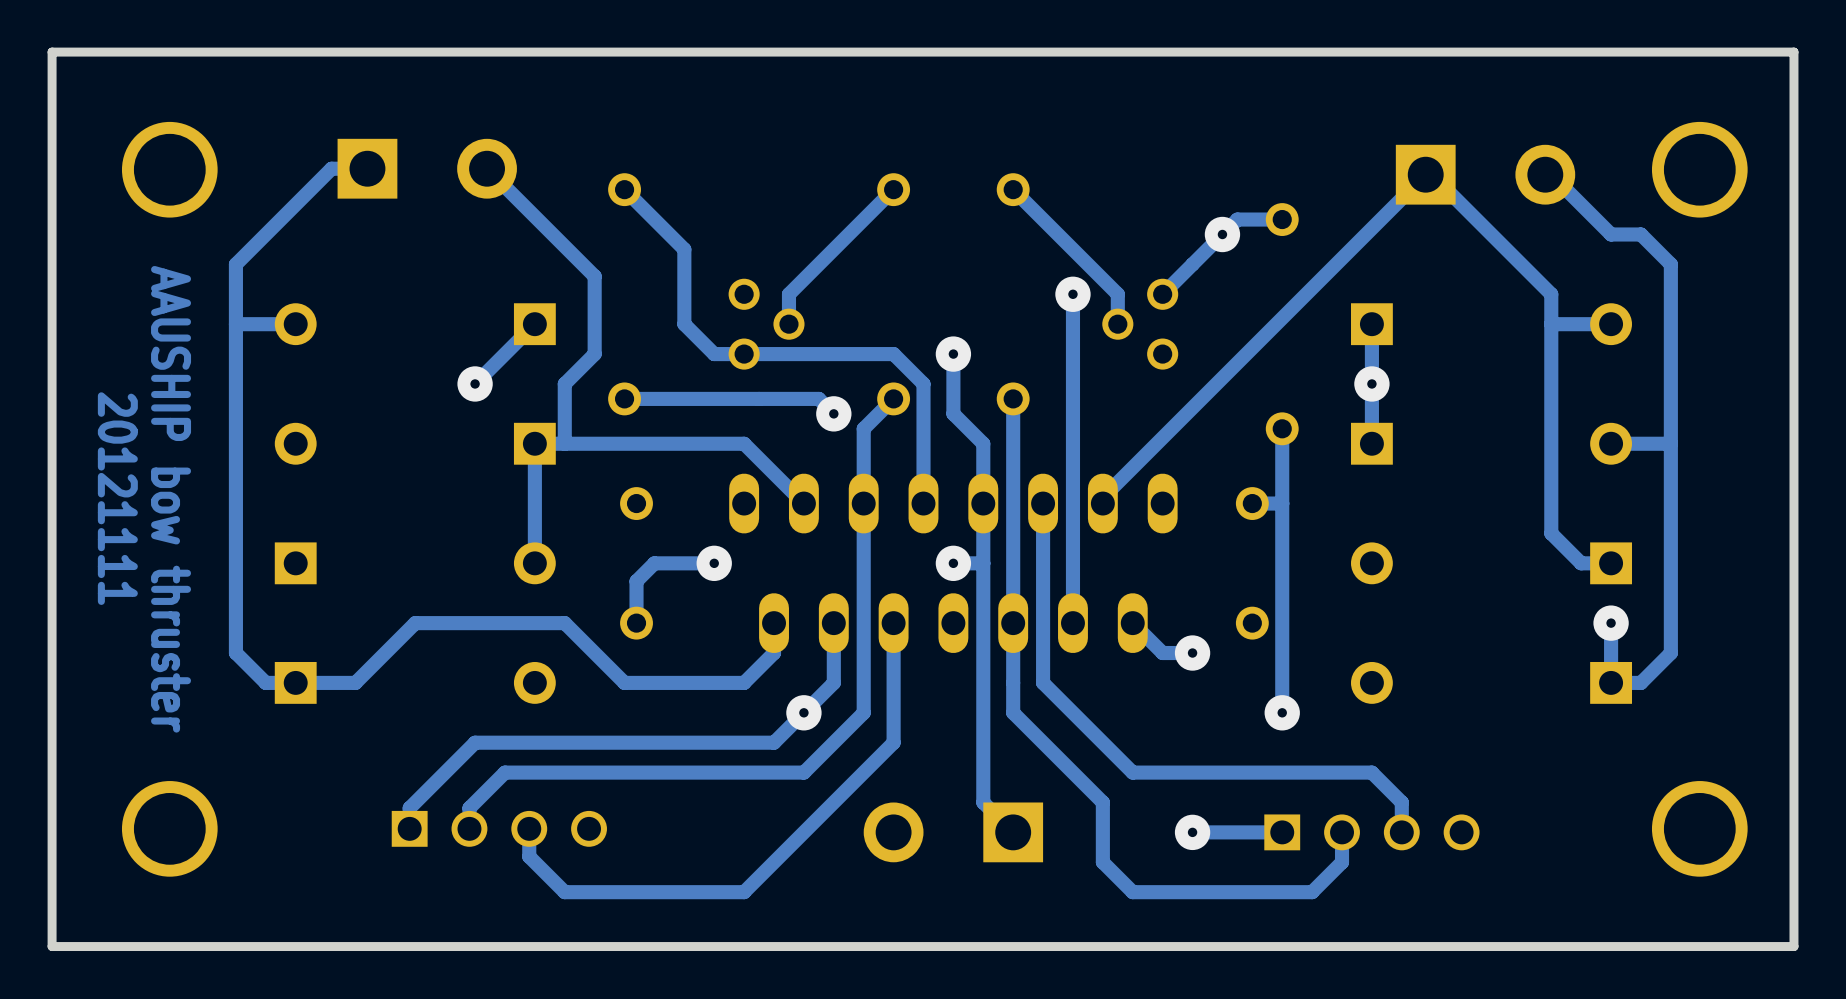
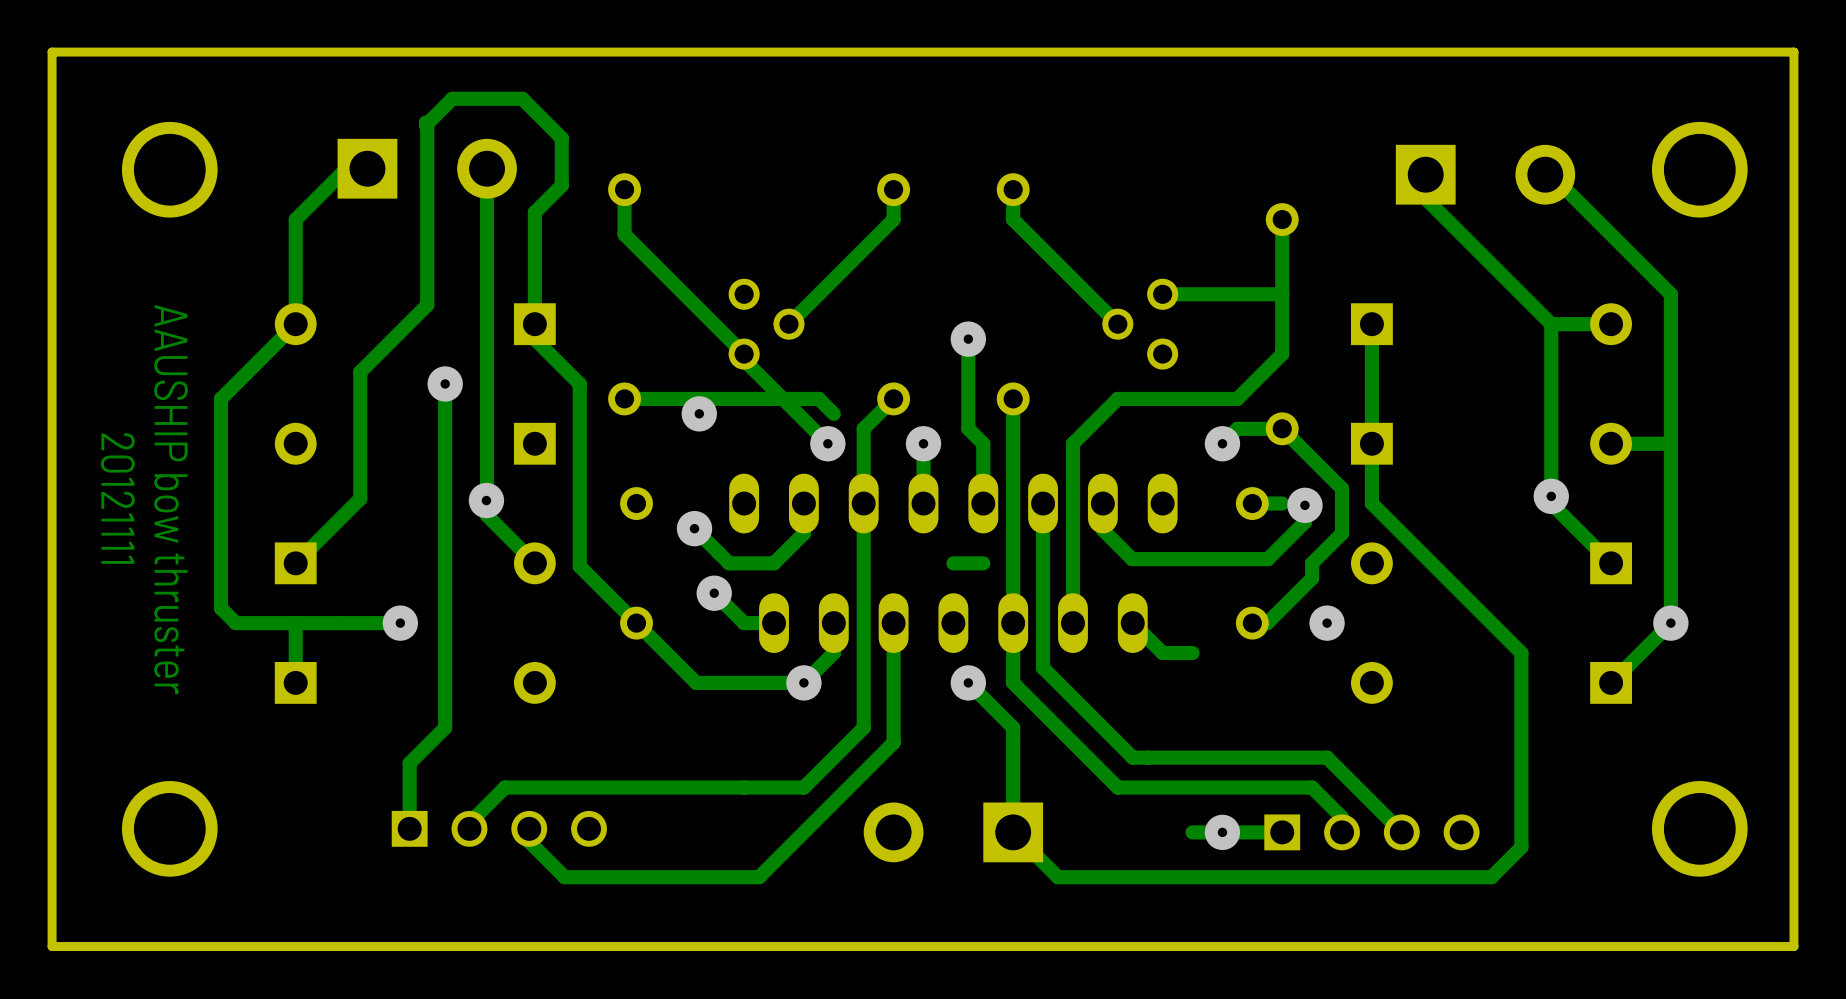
track: (346, 168) (331, 168) (235, 264) (235, 653) (265, 682) (355, 682) (415, 623) (564, 623) (624, 682) (696, 682) -> (346, 168) (295, 219) (295, 324) (220, 398) (220, 608) (235, 623) (400, 623)
track: (487, 168) (594, 276) (594, 354) (564, 383) (564, 443) -> (487, 168) (487, 515) (534, 563)
track: none -> (1425, 174) (1425, 198) (1551, 324)
track: (624, 189) (684, 249) (684, 324) (714, 354) (893, 354) (923, 383) (923, 443) -> (624, 189) (624, 234) (744, 354) (744, 360) (827, 443)
track: (893, 189) (788, 294) (788, 324) -> (893, 189) (893, 219) (788, 324)
track: (1013, 189) (1117, 294) (1117, 324) -> (1013, 189) (1013, 219) (1117, 324)
track: (1282, 219) (1237, 219) (1162, 294) -> (1282, 294) (1162, 294)
via: (1222, 234) -> none
track: (1611, 234) (1640, 234) (1670, 264) (1670, 294) -> (1611, 234) (1670, 294)
track: (1072, 294) (1072, 443) -> (1282, 219) (1282, 354) (1237, 398) (1117, 398) (1072, 443)
via: (1072, 294) -> none
track: (295, 324) (235, 324) -> none
track: (534, 324) (475, 383) -> none
track: (1551, 324) (1551, 294) (1431, 174) (1425, 174) (1102, 497) (1102, 503) -> (1304, 505) (1304, 522) (1267, 559) (1132, 559) (1102, 529) (1102, 503)
track: (953, 354) (953, 413) (968, 428) -> (968, 339) (968, 428)
via position: (953, 354) -> (968, 339)
via position: (475, 383) -> (445, 383)
via: (1371, 383) -> none
via: none -> (699, 413)
via position: (833, 413) -> (827, 443)
track: (1282, 428) (1282, 712) -> none
via: none -> (923, 443)
track: none -> (1222, 443) (1237, 428) (1282, 428) (1342, 488) (1342, 533) (1312, 563) (1312, 578) (1267, 623) (1252, 623)
via: none -> (1222, 443)
track: none -> (1371, 443) (1371, 503) (1521, 653) (1521, 847) (1491, 877) (1058, 877) (1013, 832) (1013, 727) (968, 682)
via: none -> (1551, 496)
via: none -> (486, 500)
track: (803, 503) (744, 443) (534, 443) (534, 563) -> (803, 503) (803, 533) (774, 563) (729, 563) (694, 528)
track: (983, 503) (983, 802) (1013, 832) -> none
track: (1551, 503) (1551, 533) (1581, 563) (1611, 563) -> (1551, 503) (1611, 563)
via: none -> (1304, 505)
via: none -> (694, 528)
track: none -> (295, 563) (360, 498) (360, 372) (427, 305) (427, 123) (426, 122) (426, 125) (452, 98) (522, 98) (561, 138) (561, 185) (534, 212) (534, 339) (579, 383) (579, 566) (696, 682)
track: (714, 563) (654, 563) (636, 581) (636, 623) -> none
via: (714, 563) -> none
via: (953, 563) -> none
track: none -> (714, 593) (744, 623) (774, 623)
via: none -> (714, 593)
track: none -> (295, 623) (295, 682)
via: none -> (400, 623)
track: (774, 623) (774, 653) (744, 682) -> (833, 653) (803, 682) (744, 682)
via: none -> (1327, 623)
via position: (1611, 623) -> (1670, 623)
track: (1670, 623) (1670, 653) (1640, 682) (1611, 682) (1611, 623) -> (1670, 623) (1611, 682)
track: (833, 653) (833, 682) (774, 742) (475, 742) (409, 808) -> (445, 383) (445, 727) (409, 763) (409, 808)
via: (1192, 653) -> none
track: (1043, 667) (1043, 682) (1132, 772) (1371, 772) (1401, 802) (1401, 832) -> (1043, 667) (1132, 757) (1327, 757) (1401, 832)
via: none -> (968, 682)
track: (1013, 682) (1013, 712) (1102, 802) (1102, 862) (1132, 892) (1312, 892) (1342, 862) (1342, 832) -> (1013, 682) (1117, 787) (1312, 787) (1342, 817) (1342, 832)
via position: (803, 712) -> (803, 682)
track: (863, 712) (803, 772) (504, 772) (469, 808) (469, 823) -> (863, 712) (863, 727) (803, 787) (504, 787) (469, 823)
via: (1282, 712) -> none
via position: (1192, 832) -> (1222, 832)
track: (529, 841) (529, 856) (564, 892) (744, 892) (759, 877) -> (529, 841) (564, 877) (759, 877)

